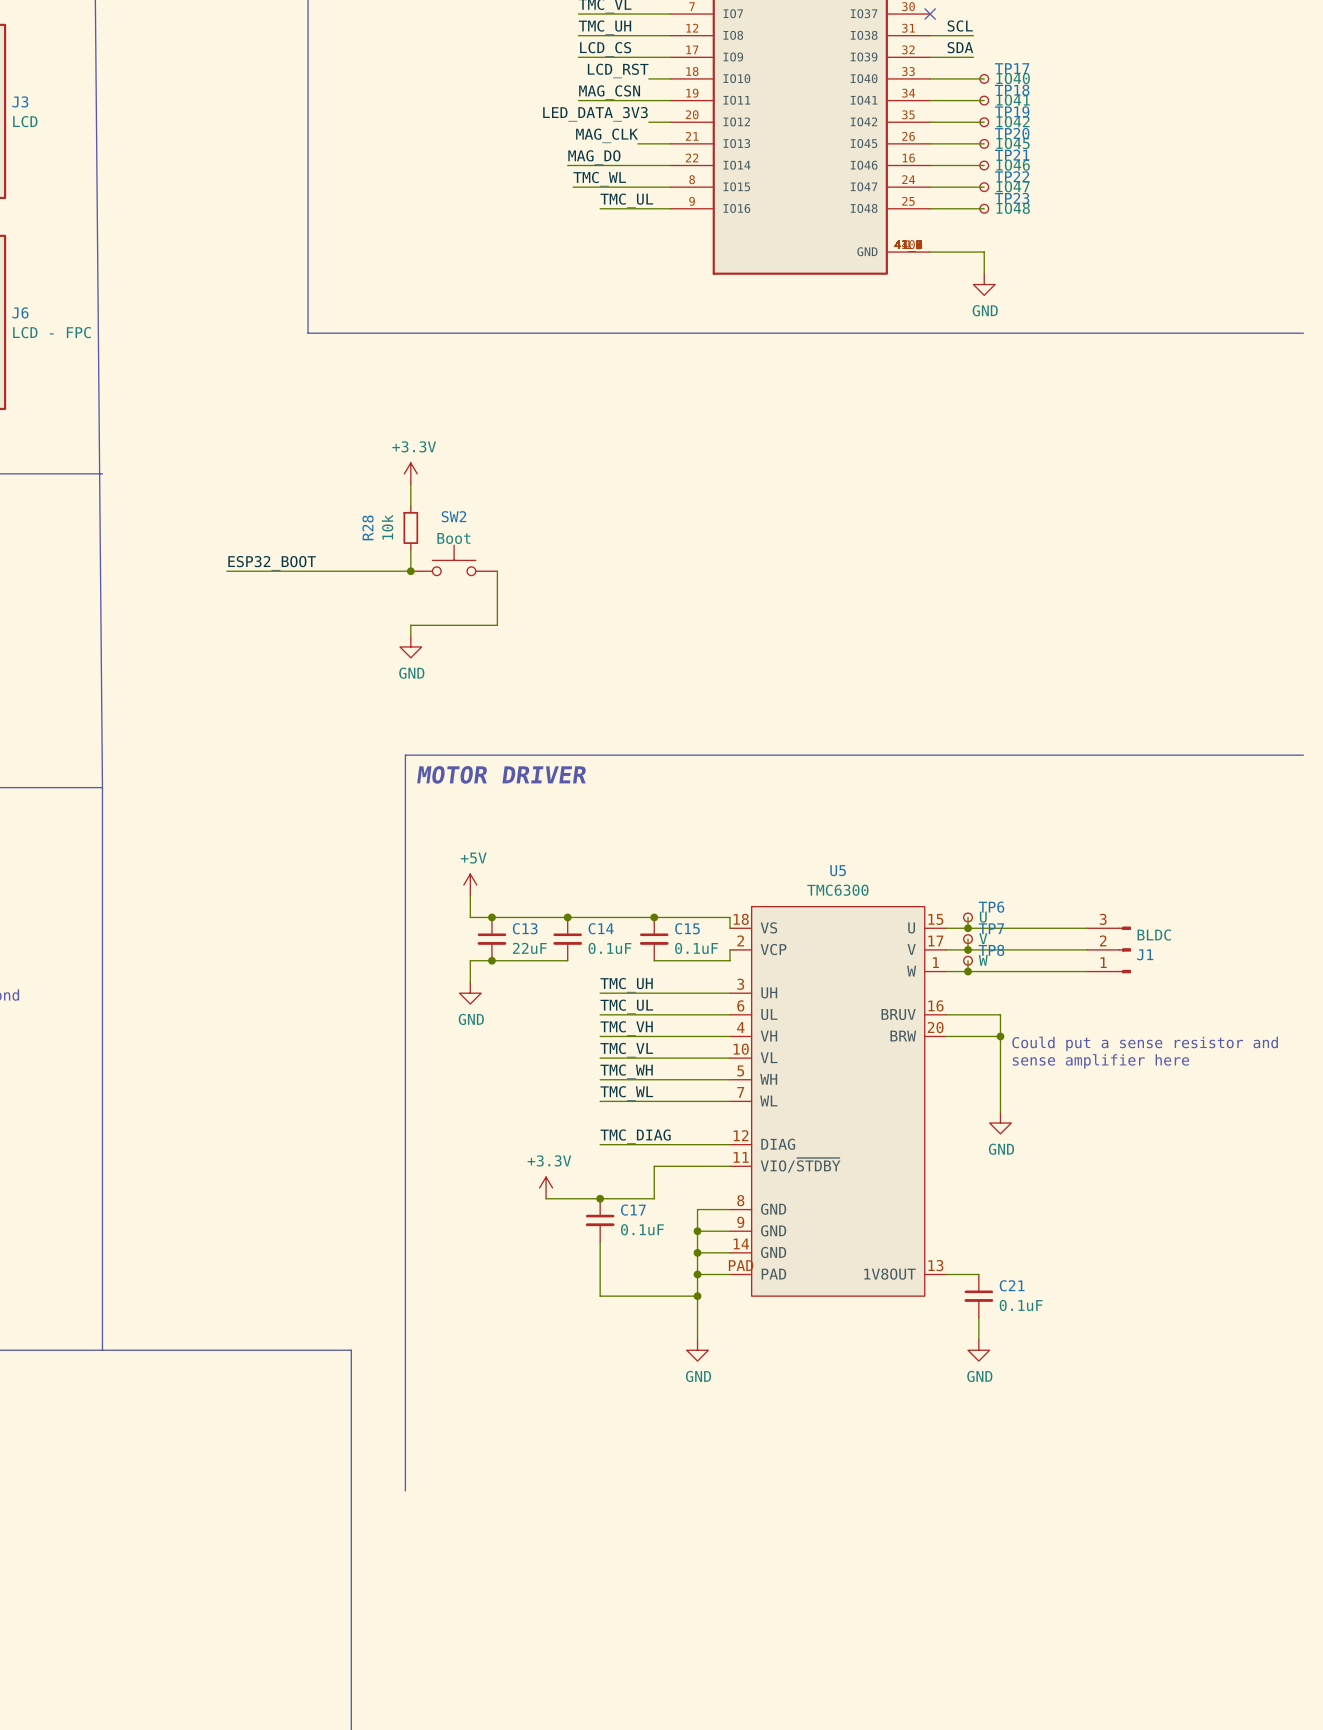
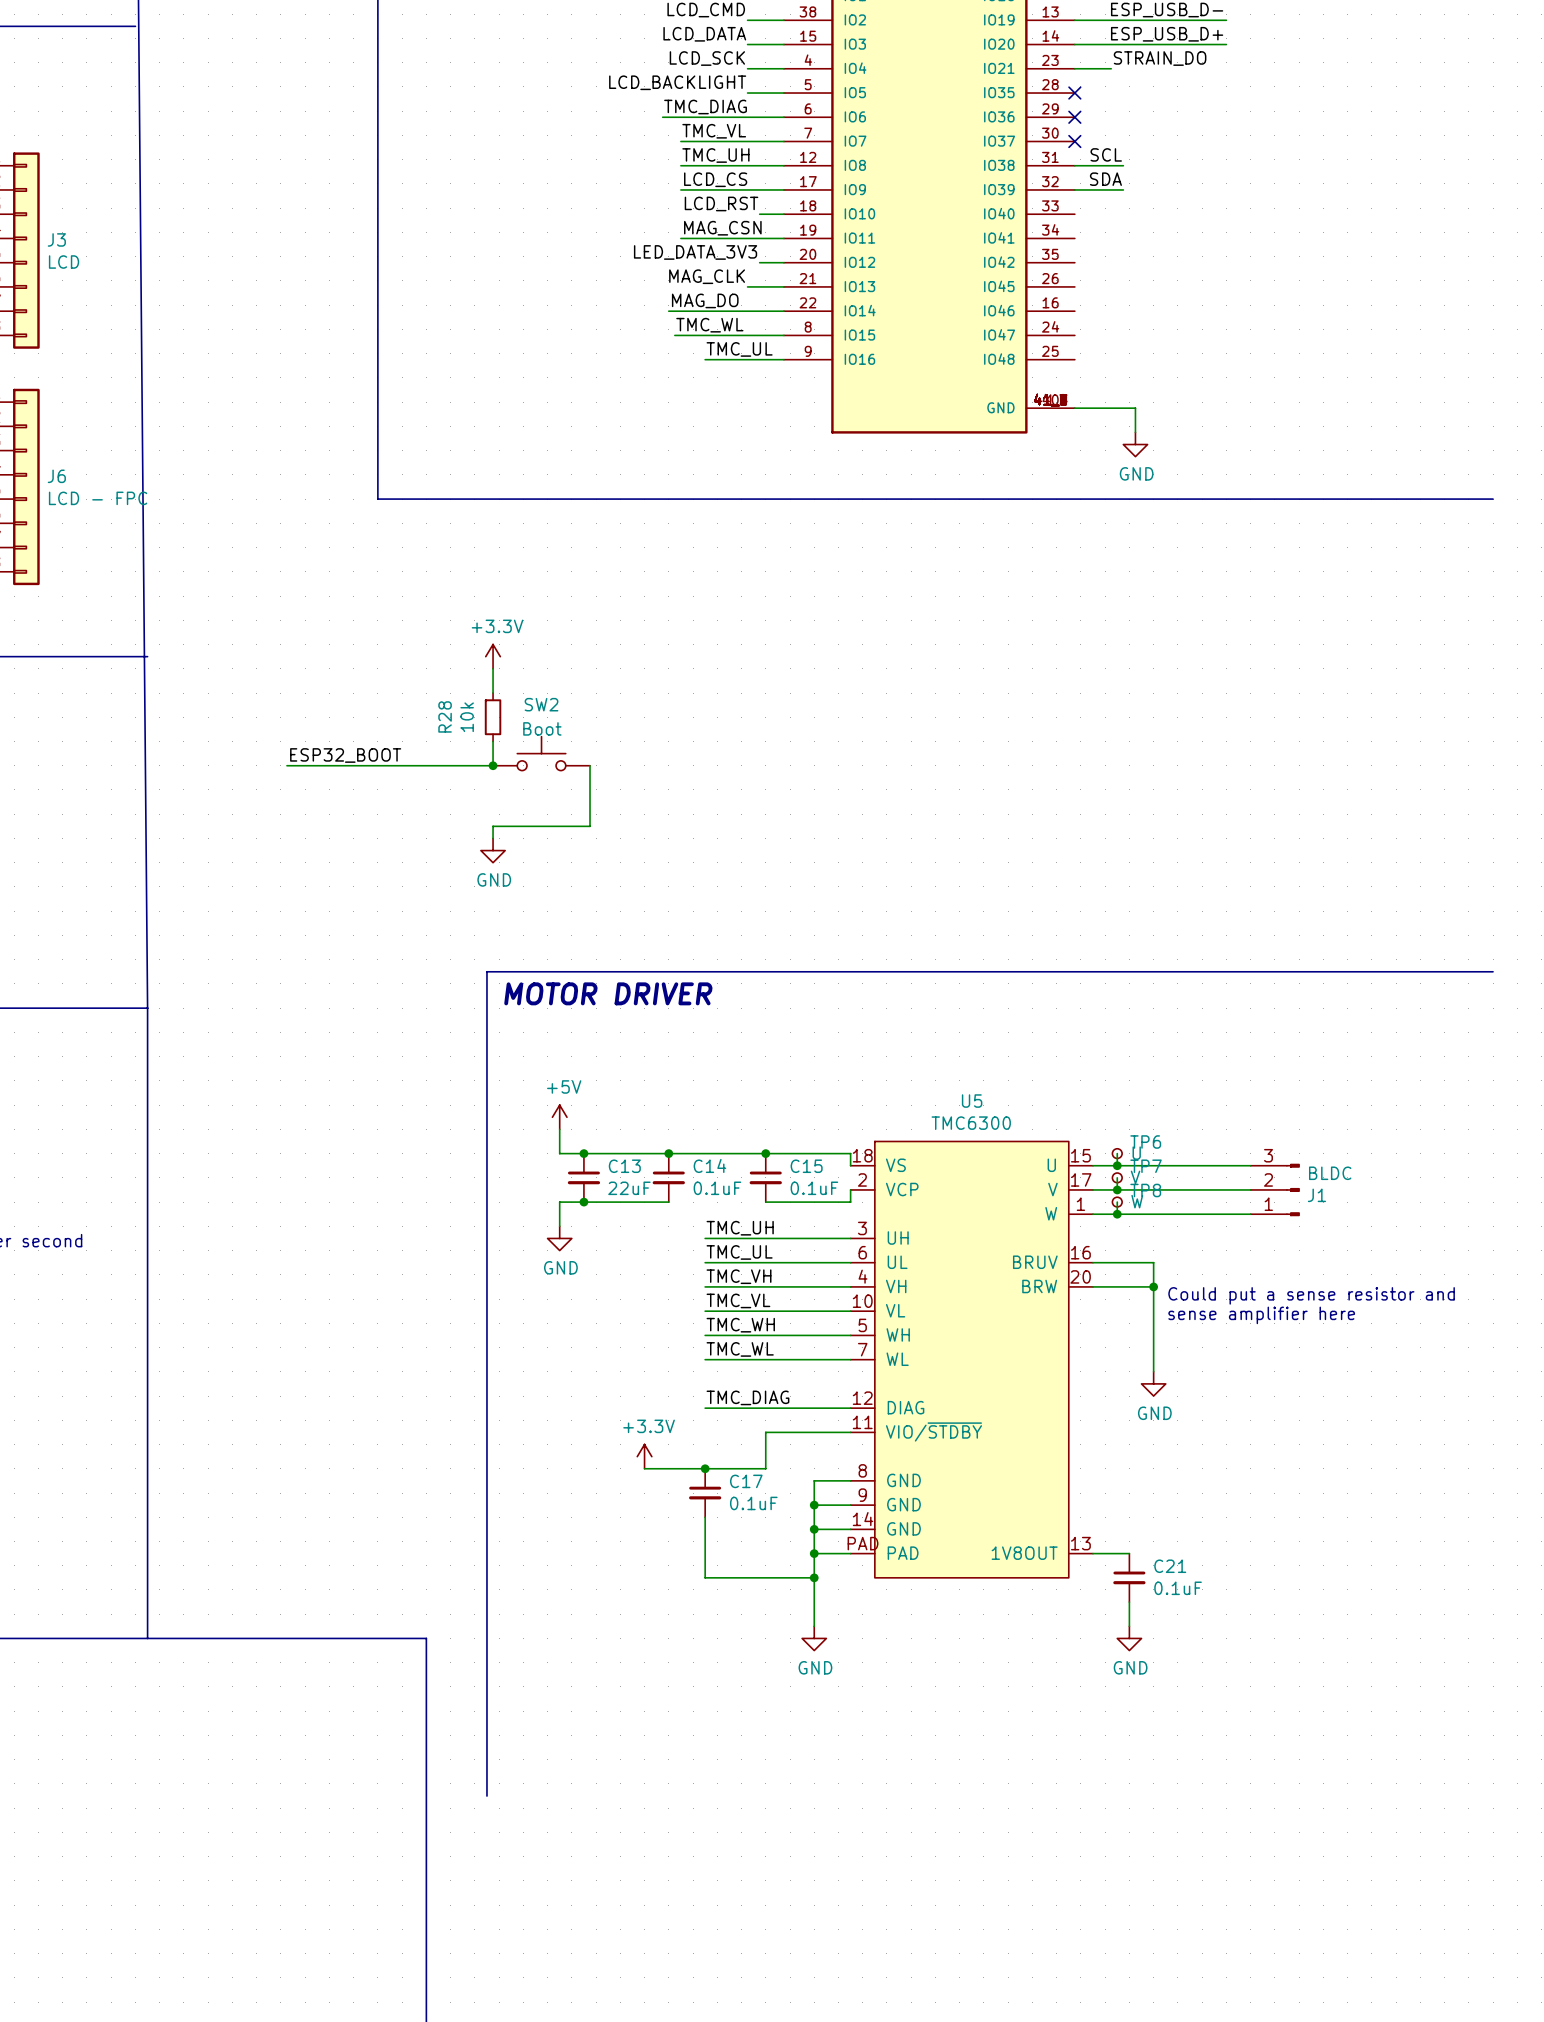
wire: (930, 78) (984, 78) -> none
TP17: IO40 (984, 78) -> none
wire: (930, 100) (984, 100) -> none
TP18: IO41 (984, 100) -> none
wire: (930, 122) (984, 122) -> none
TP19: IO42 (984, 122) -> none
wire: (930, 143) (984, 143) -> none
TP20: IO45 (984, 143) -> none
wire: (930, 165) (984, 165) -> none
TP21: IO46 (984, 165) -> none
wire: (930, 187) (984, 187) -> none
TP22: IO47 (984, 187) -> none
wire: (930, 208) (984, 208) -> none
TP23: IO48 (984, 208) -> none

